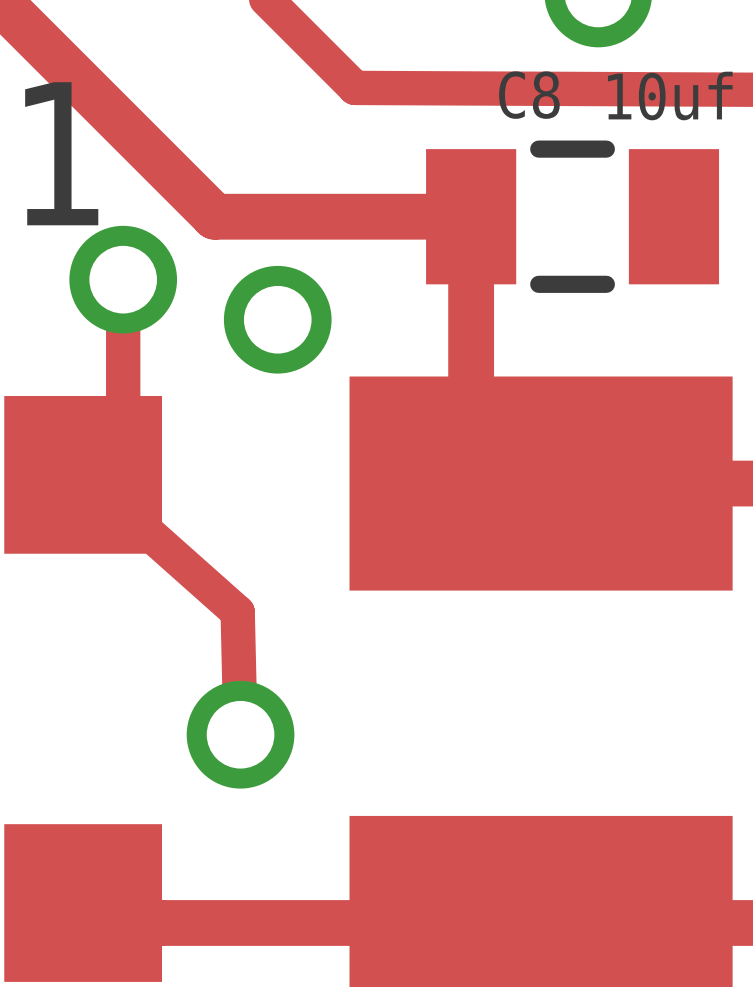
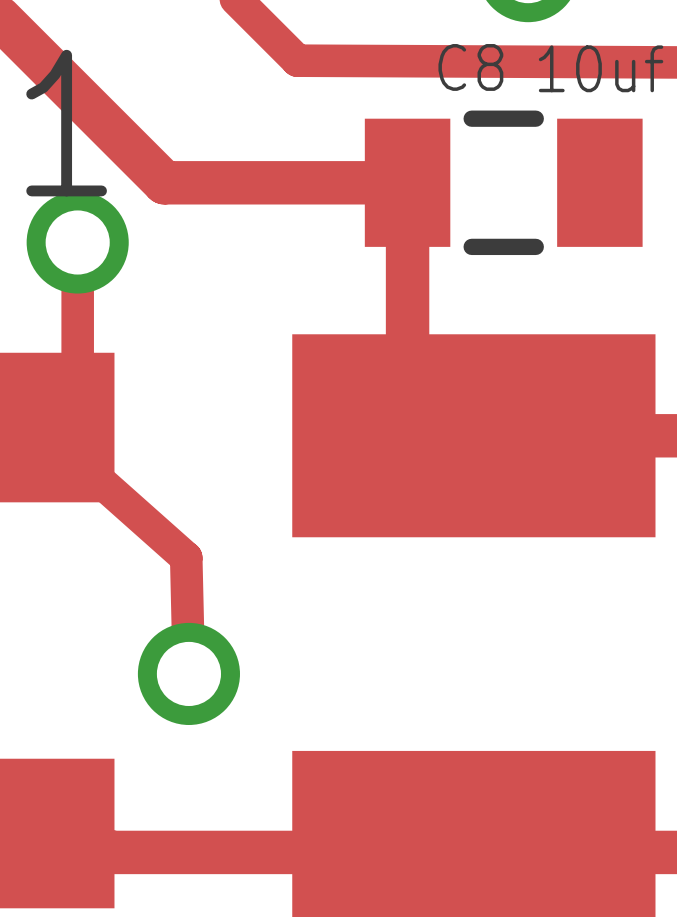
via: (277, 319) -> none

